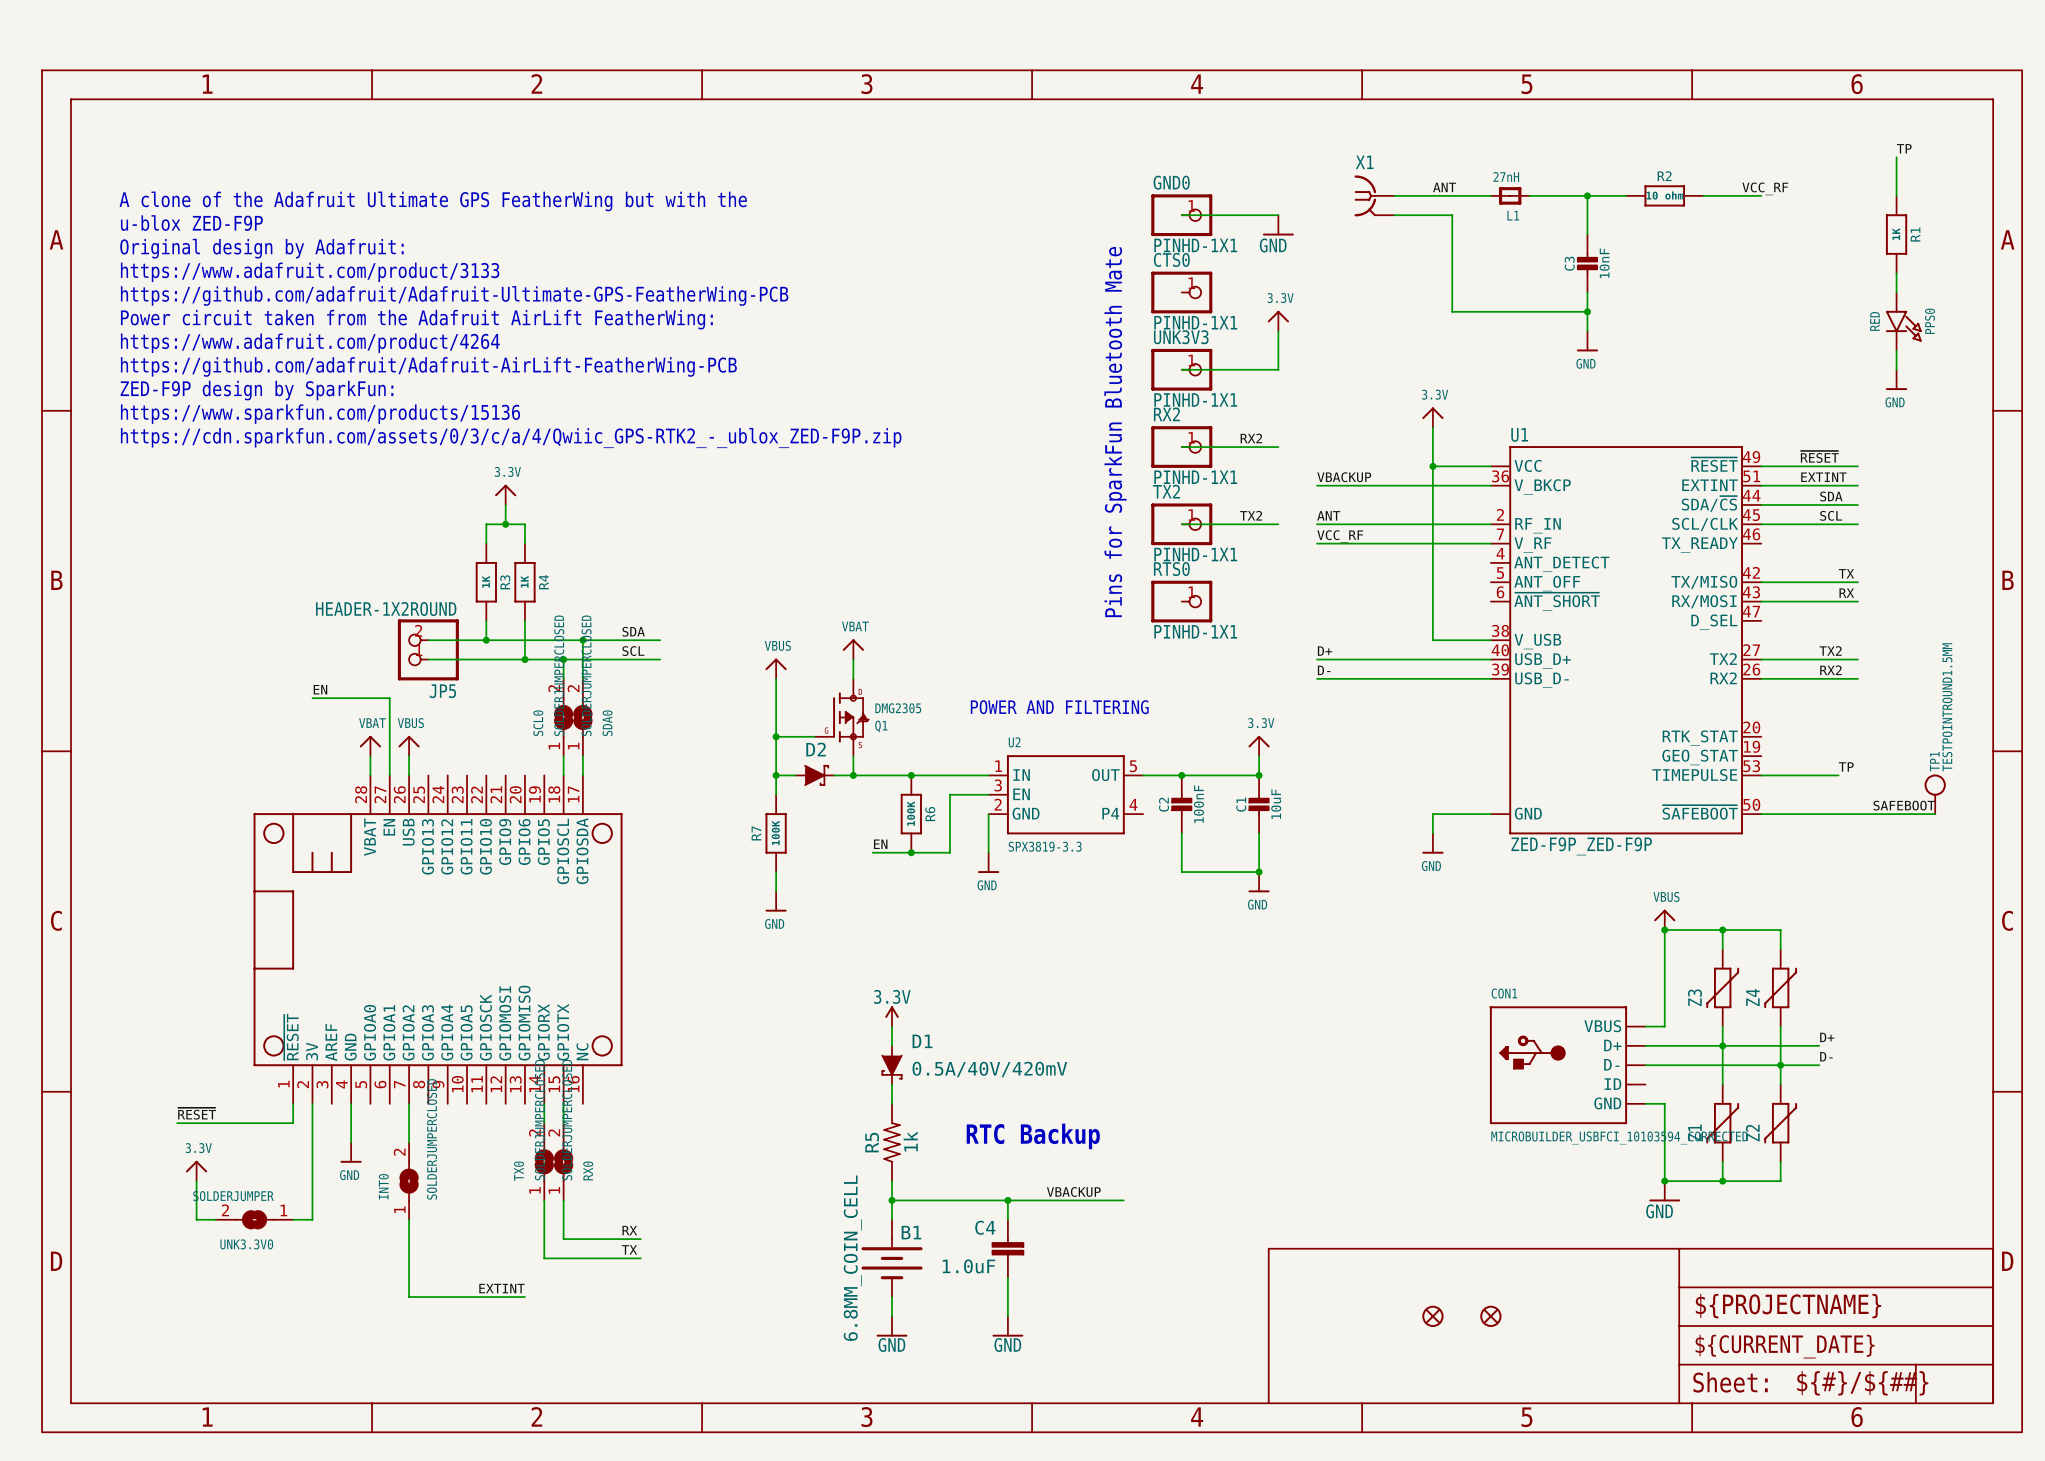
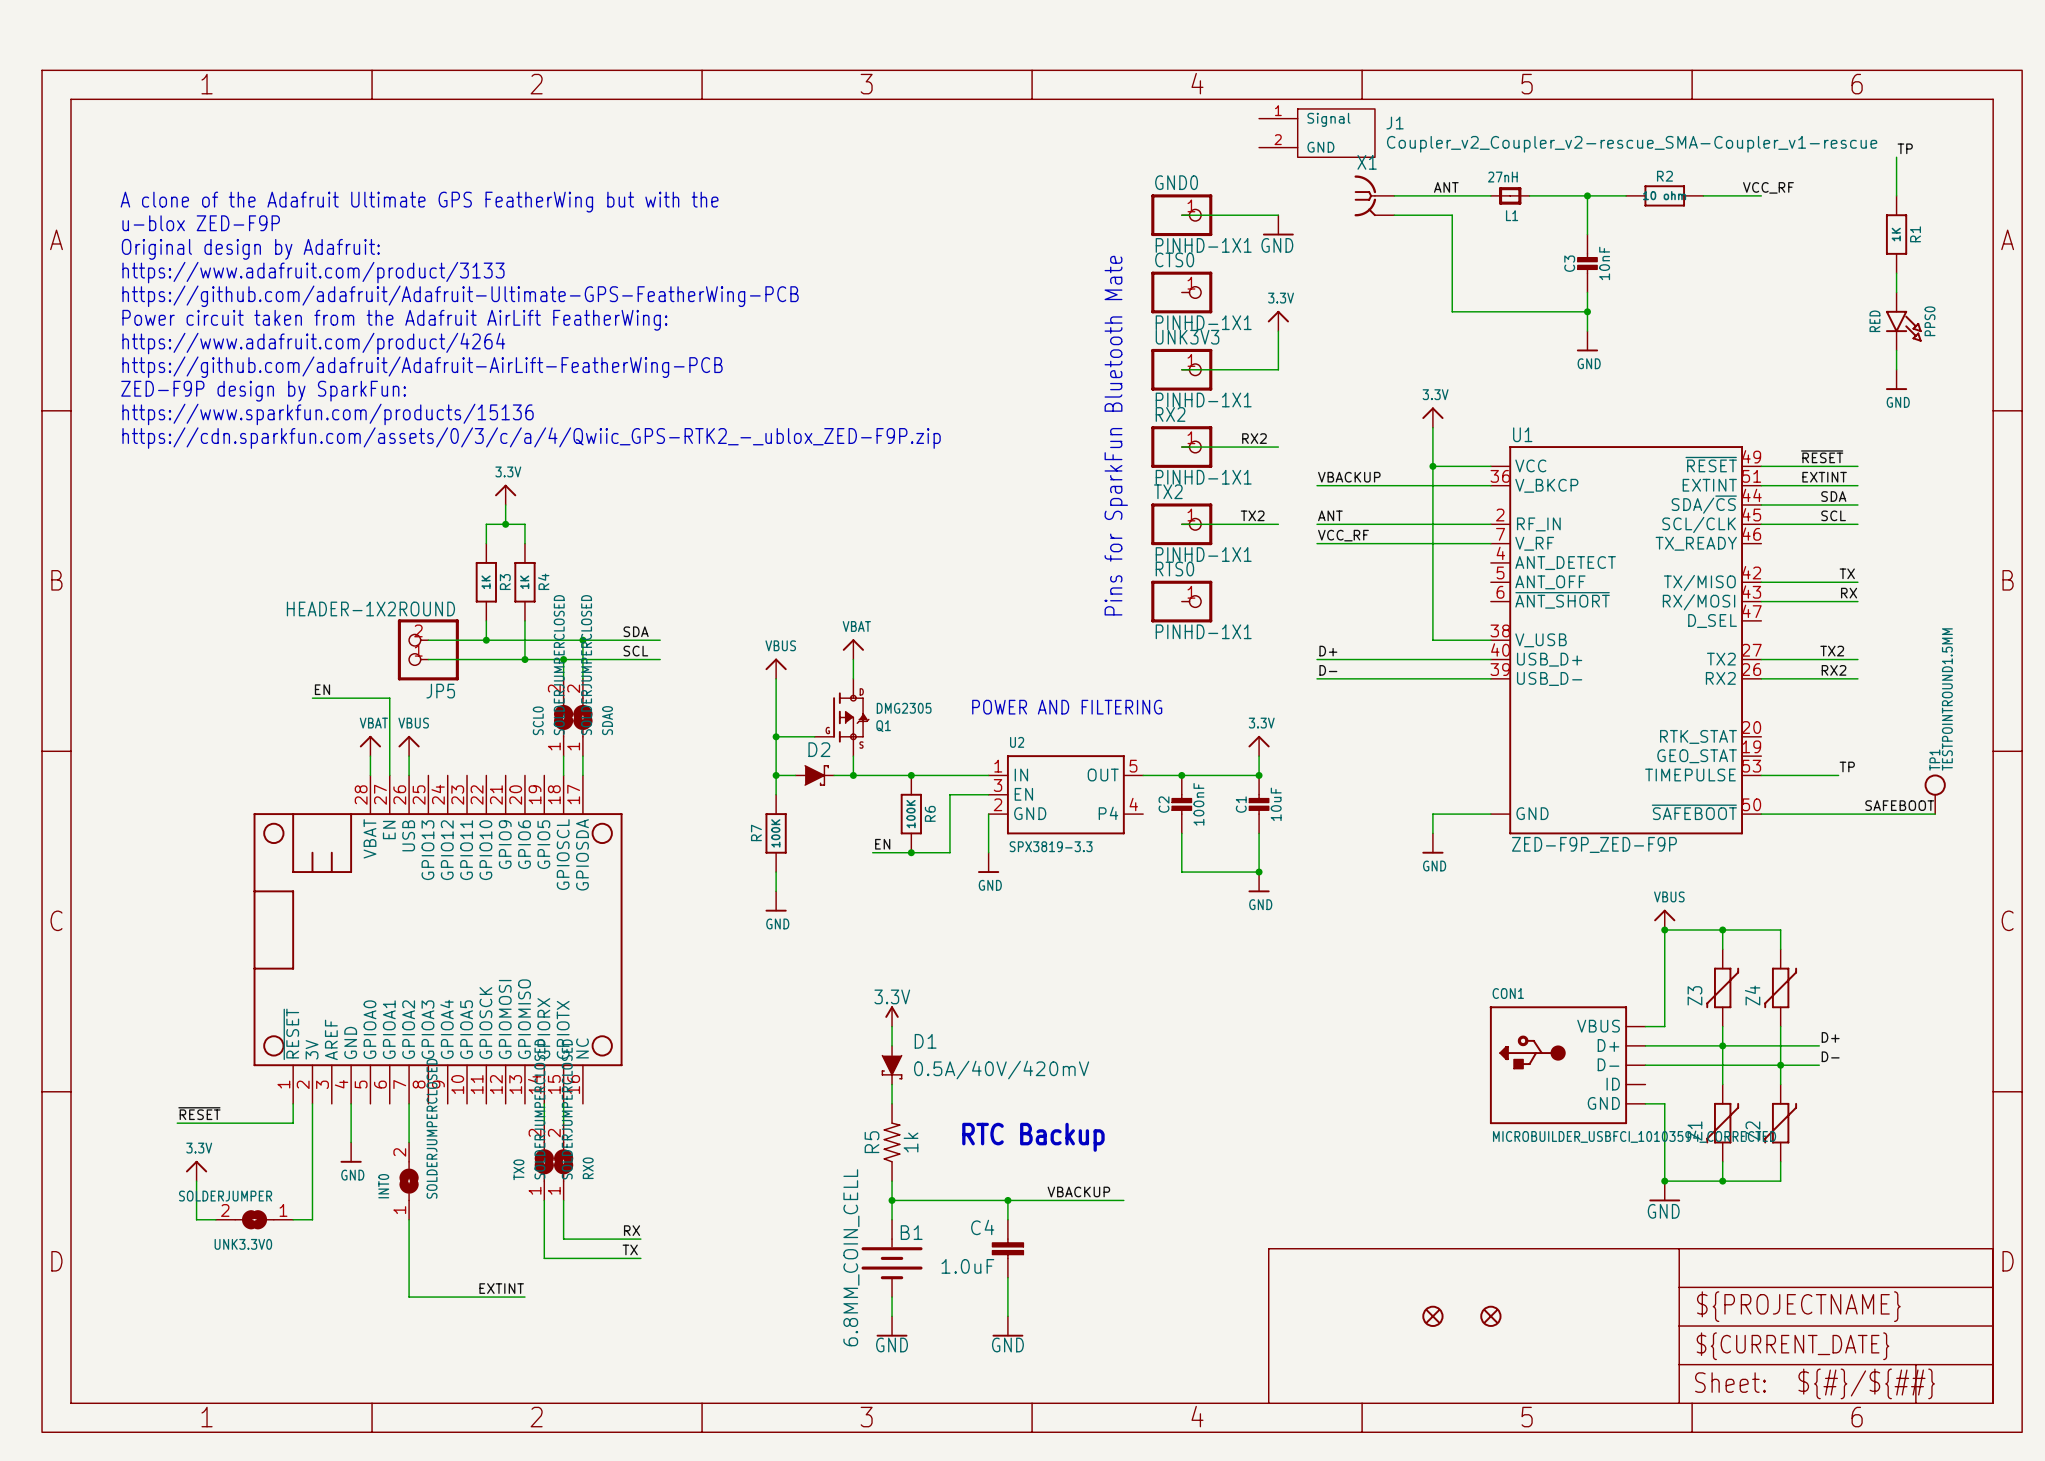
J1: none -> Coupler_v2_Coupler_v2-rescue_SMA-Coupler_v1-rescue (1317, 133)

